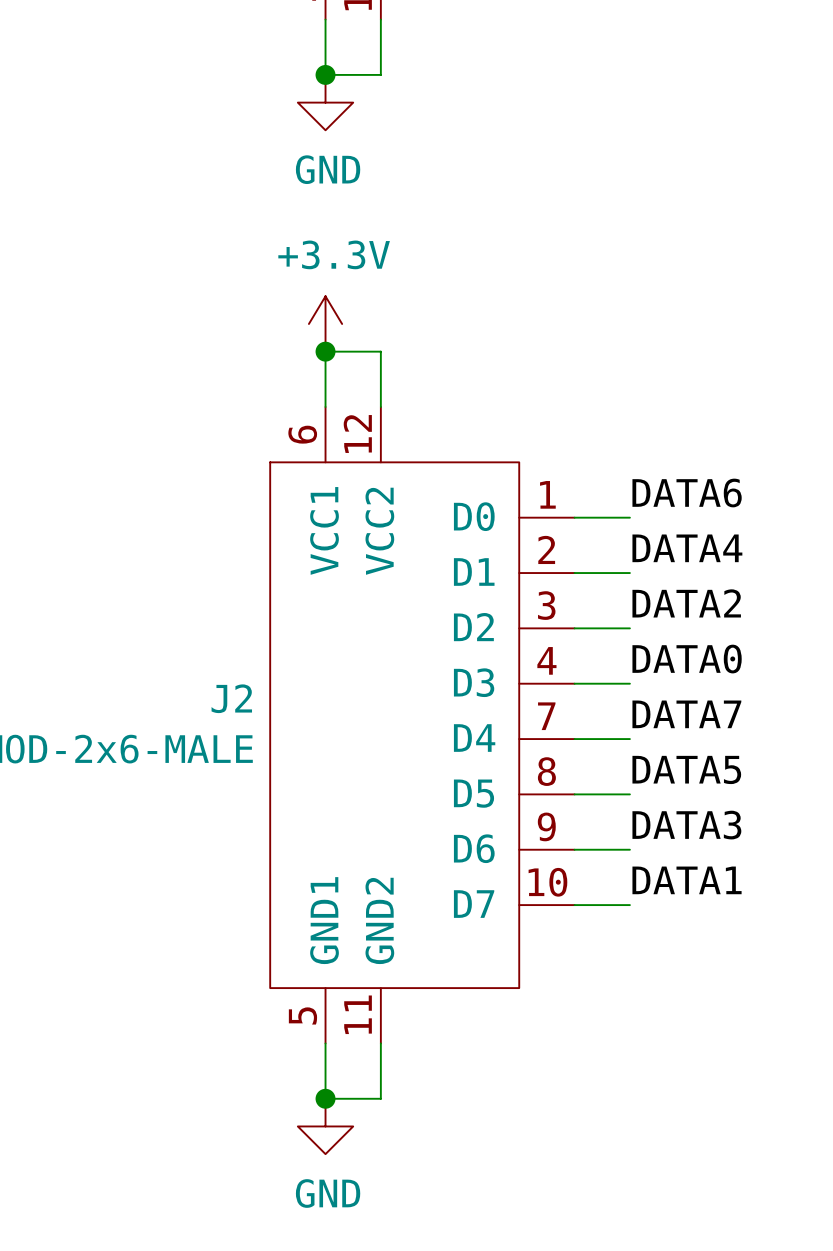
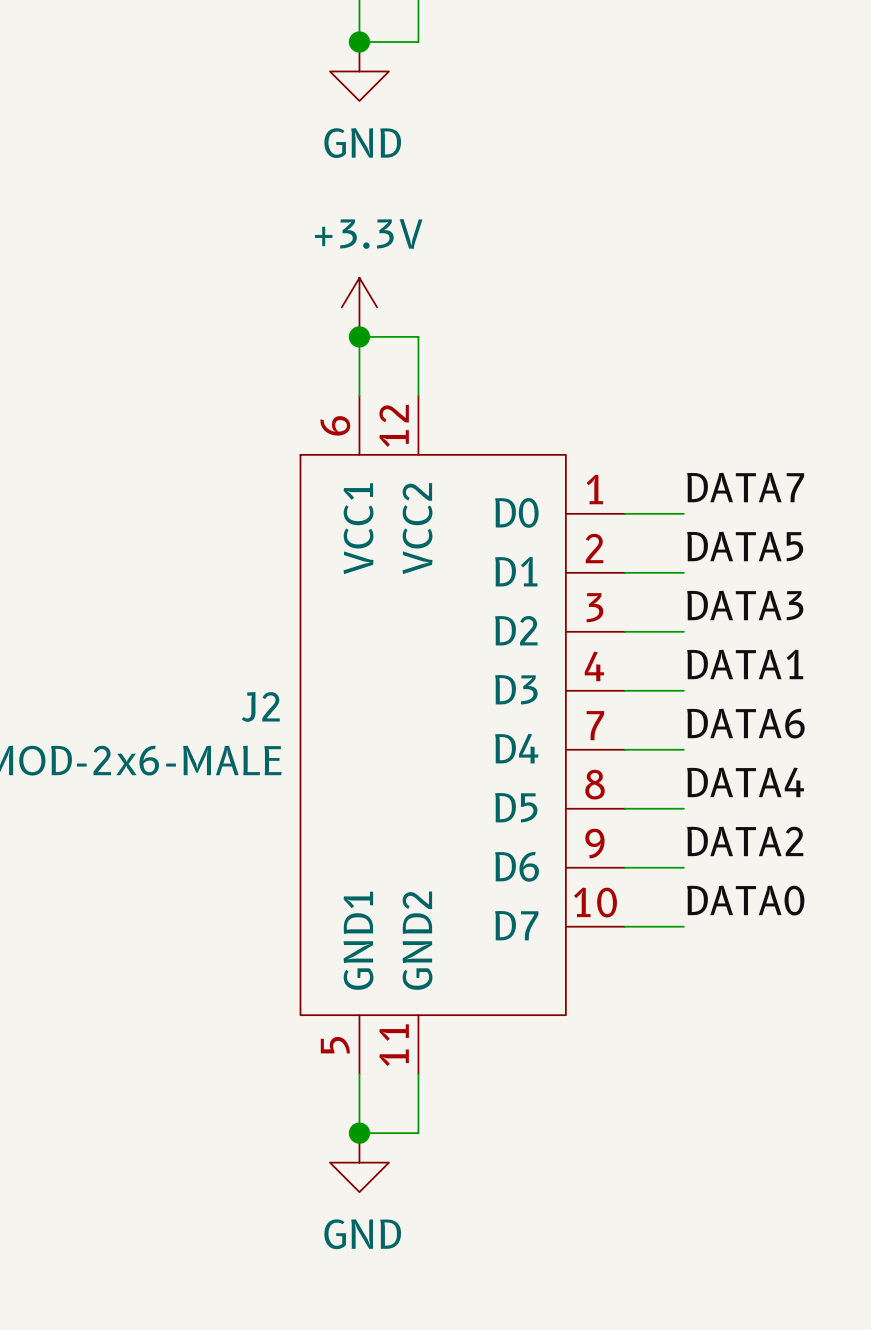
label: DATA6 (687, 493) -> DATA7 (745, 487)
label: DATA4 (687, 548) -> DATA5 (745, 546)
label: DATA2 (686, 603) -> DATA3 (745, 605)
label: DATA0 (687, 659) -> DATA1 (745, 664)
label: DATA7 (686, 714) -> DATA6 (745, 723)
label: DATA5 (686, 769) -> DATA4 (745, 782)
label: DATA3 (686, 825) -> DATA2 (745, 841)
label: DATA1 (687, 880) -> DATA0 (745, 900)

